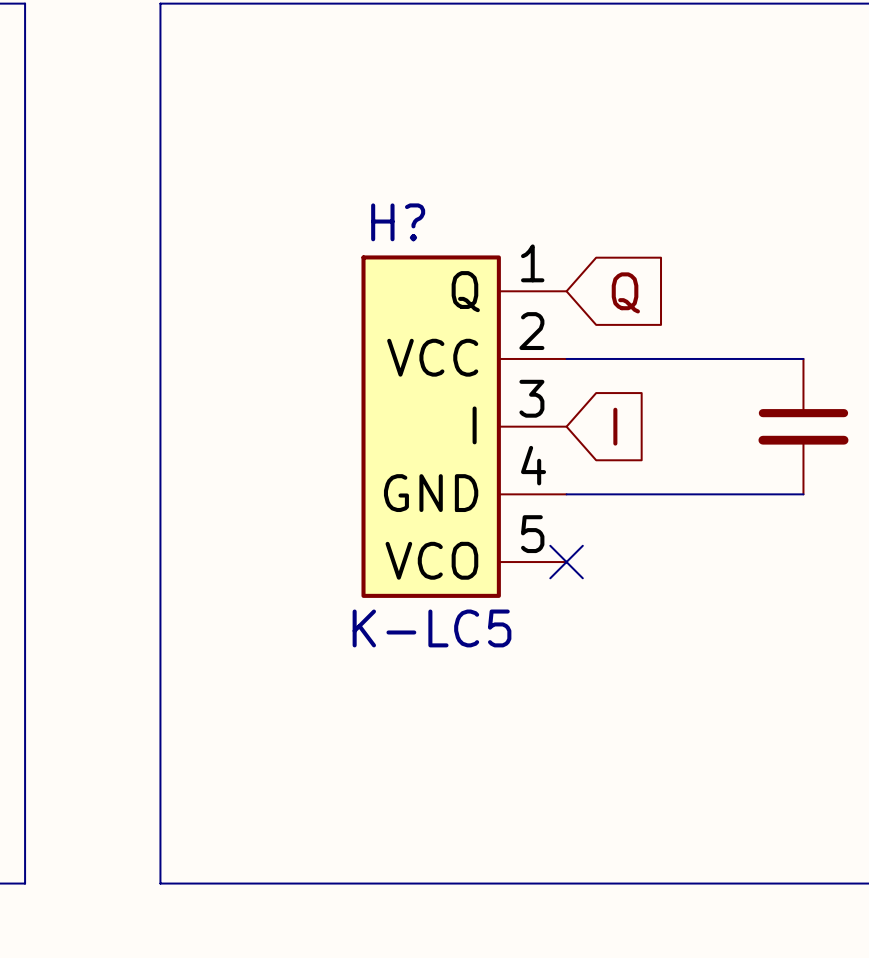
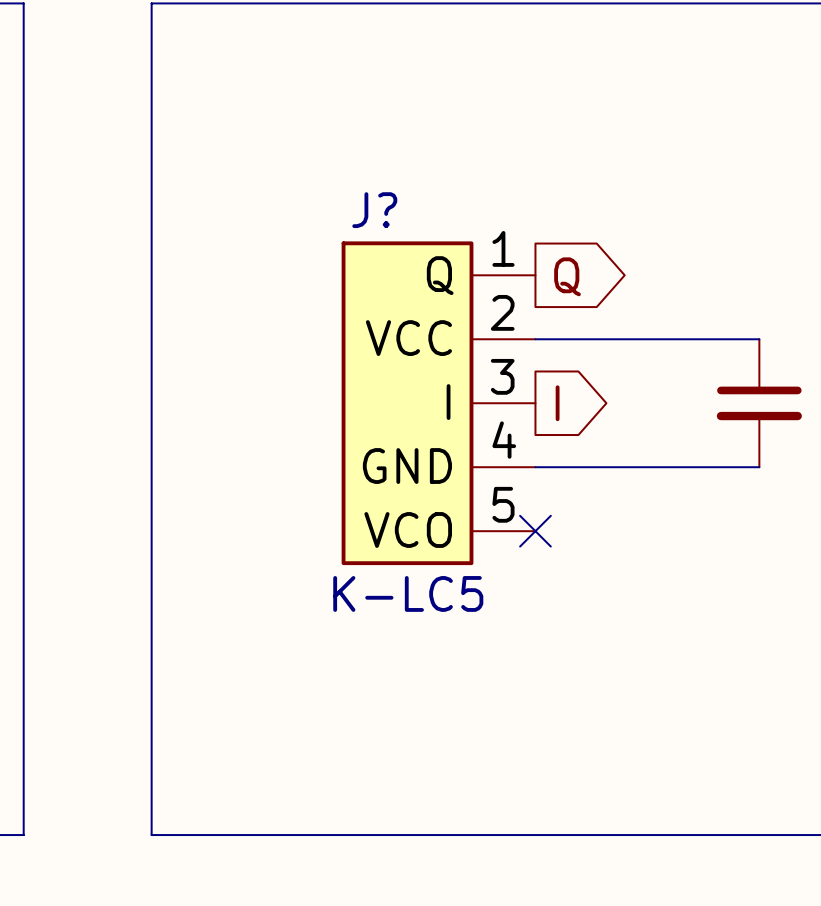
H? name: H? (398, 222) -> J? (374, 210)
global label shape: input (625, 292) -> output (567, 276)
global label shape: input (615, 426) -> output (557, 403)

